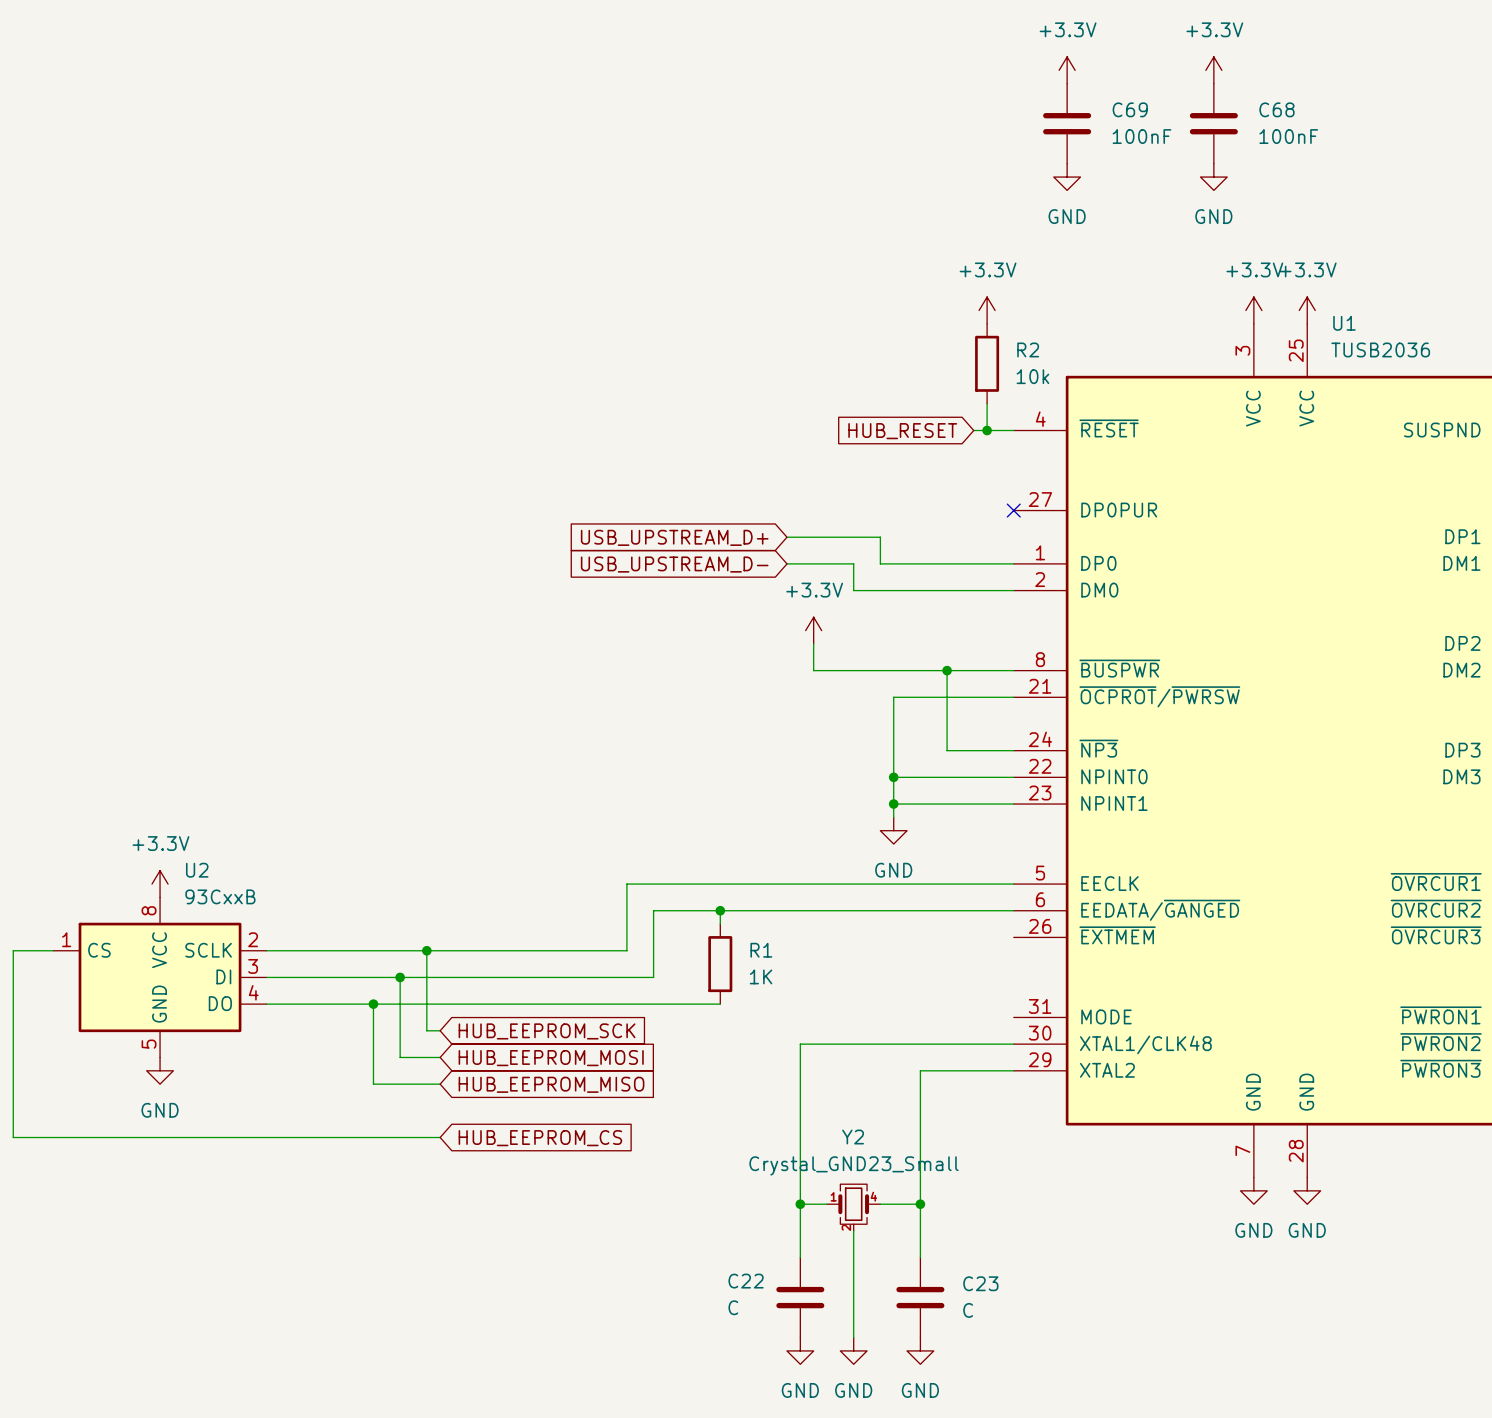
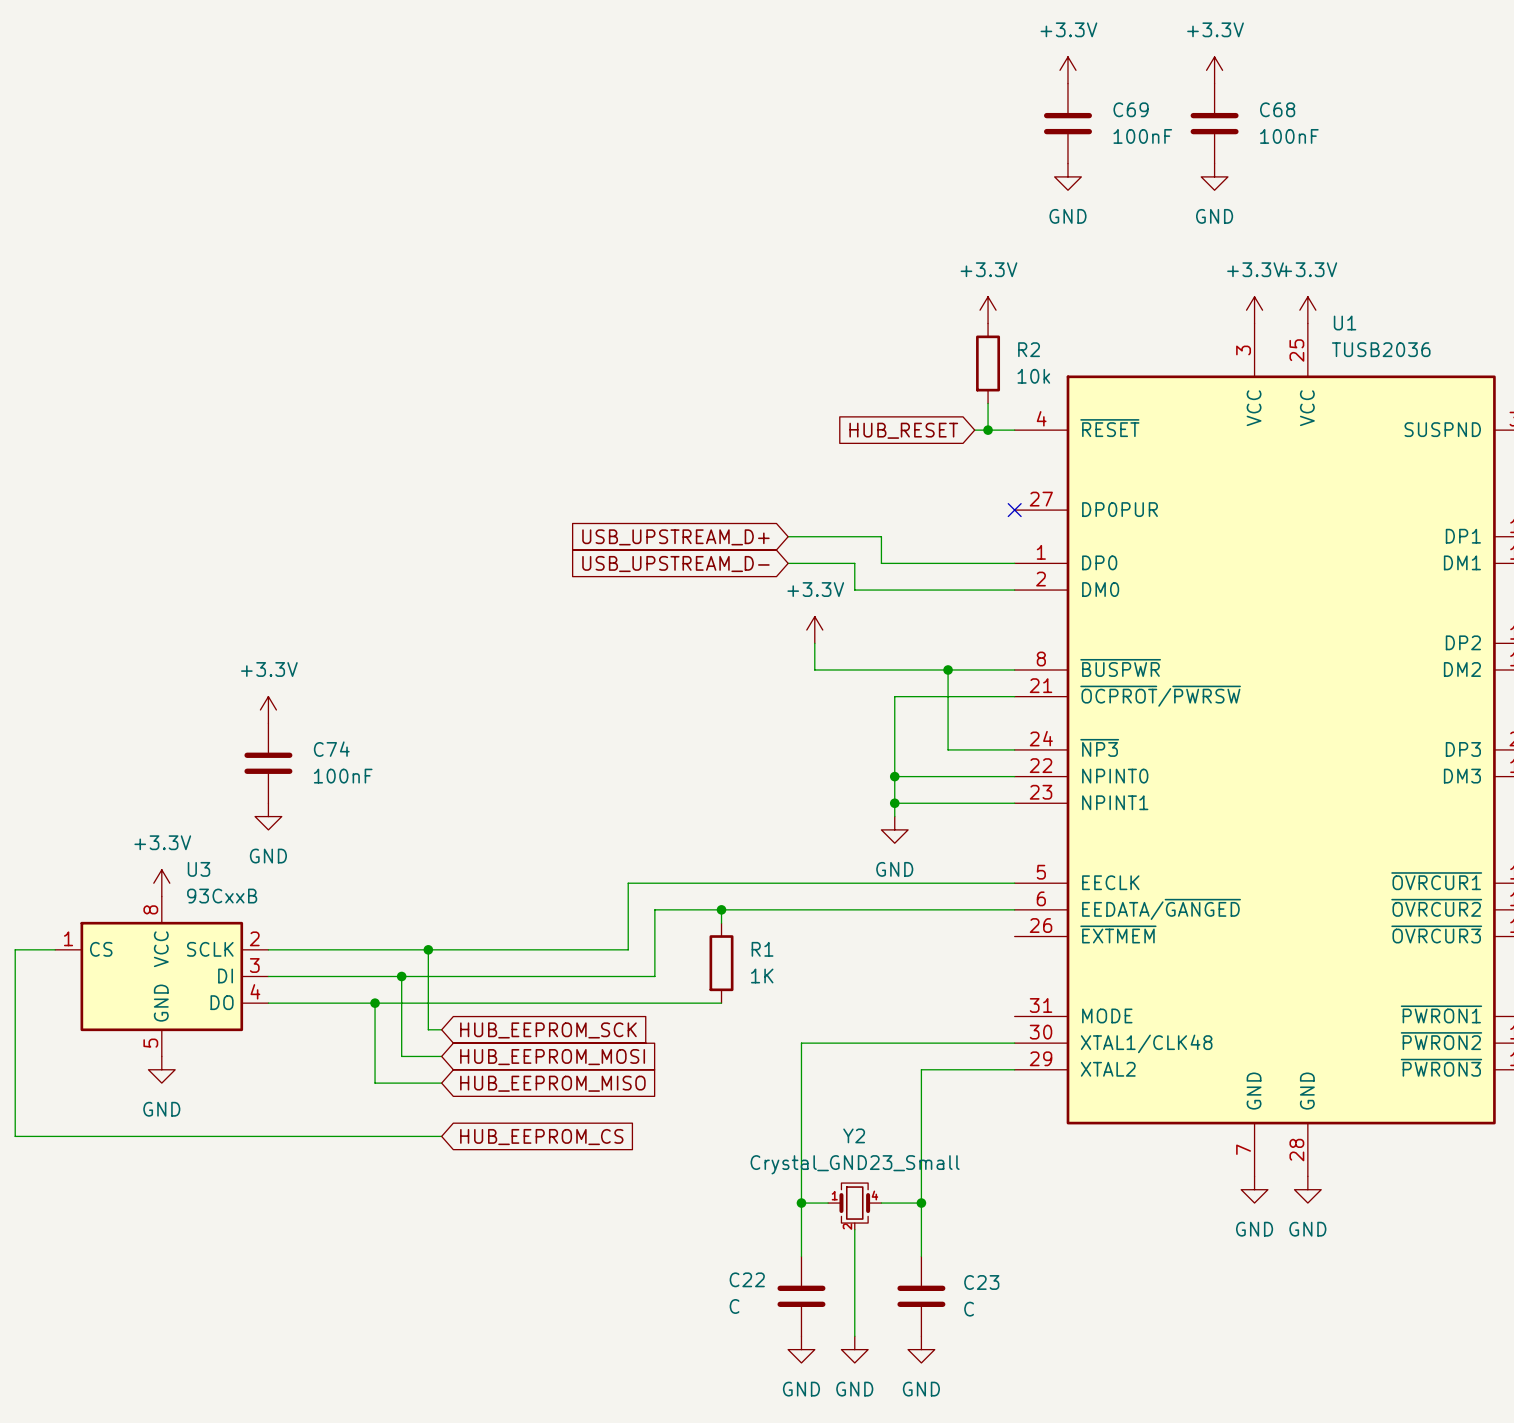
power symbol: none -> +3.3V (268, 709)
C74: none -> 100nF (268, 763)
power symbol: none -> GND (268, 816)
U2 name: U2 (197, 870) -> U3 (198, 869)

